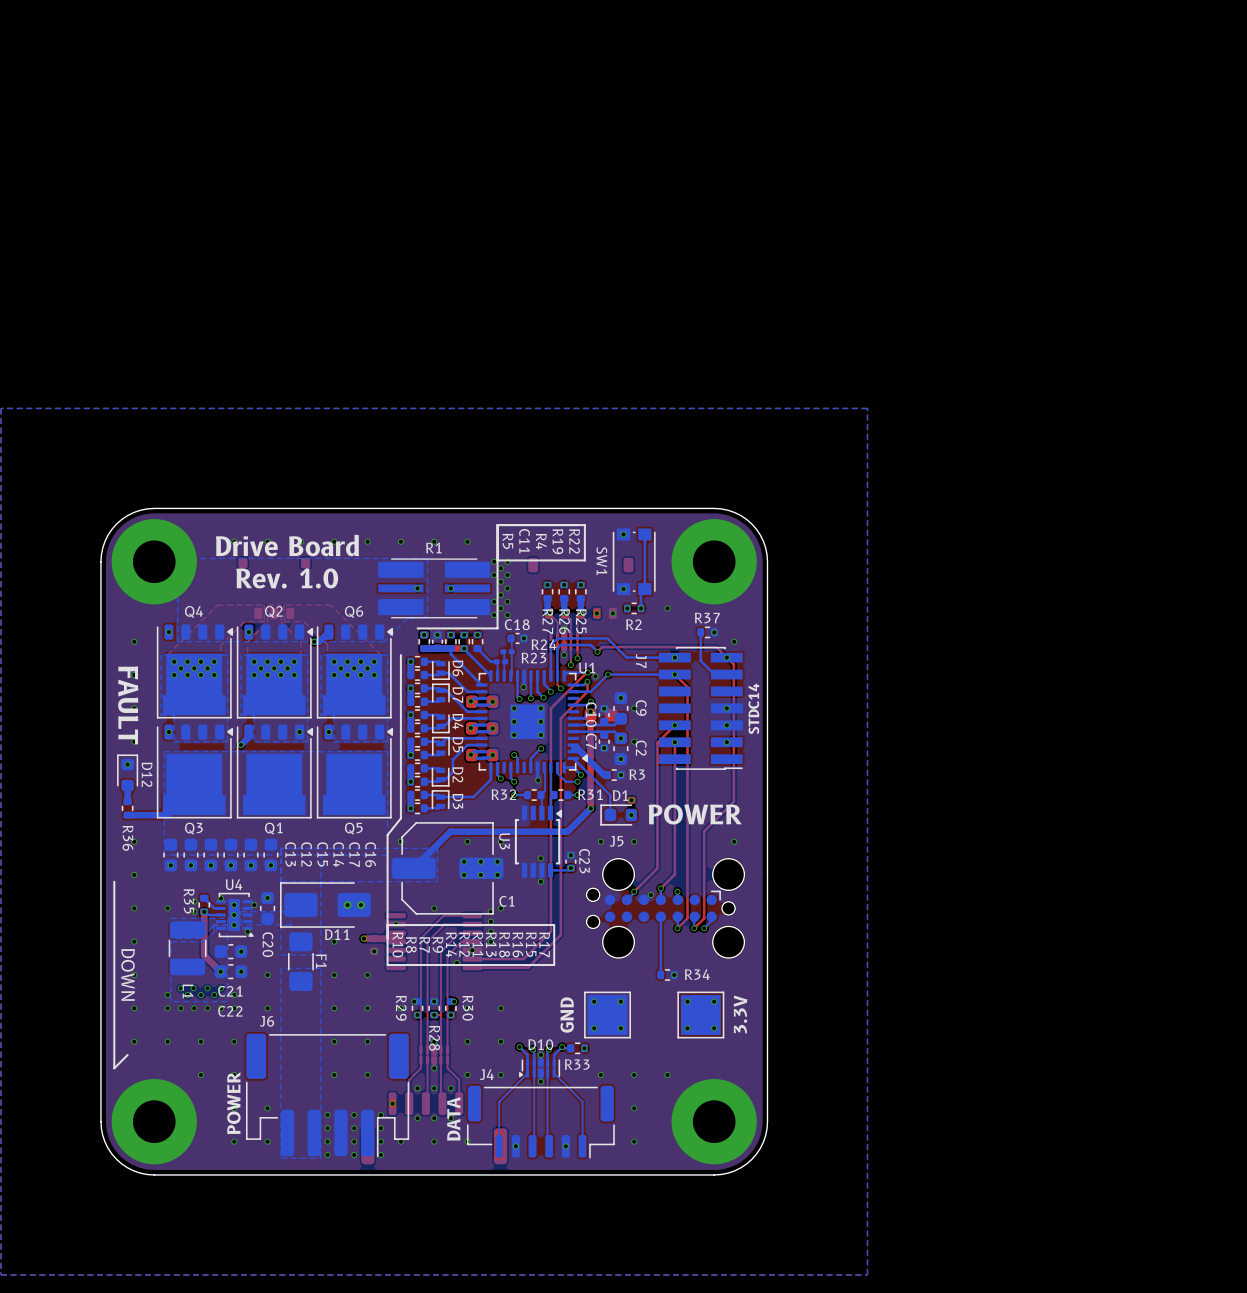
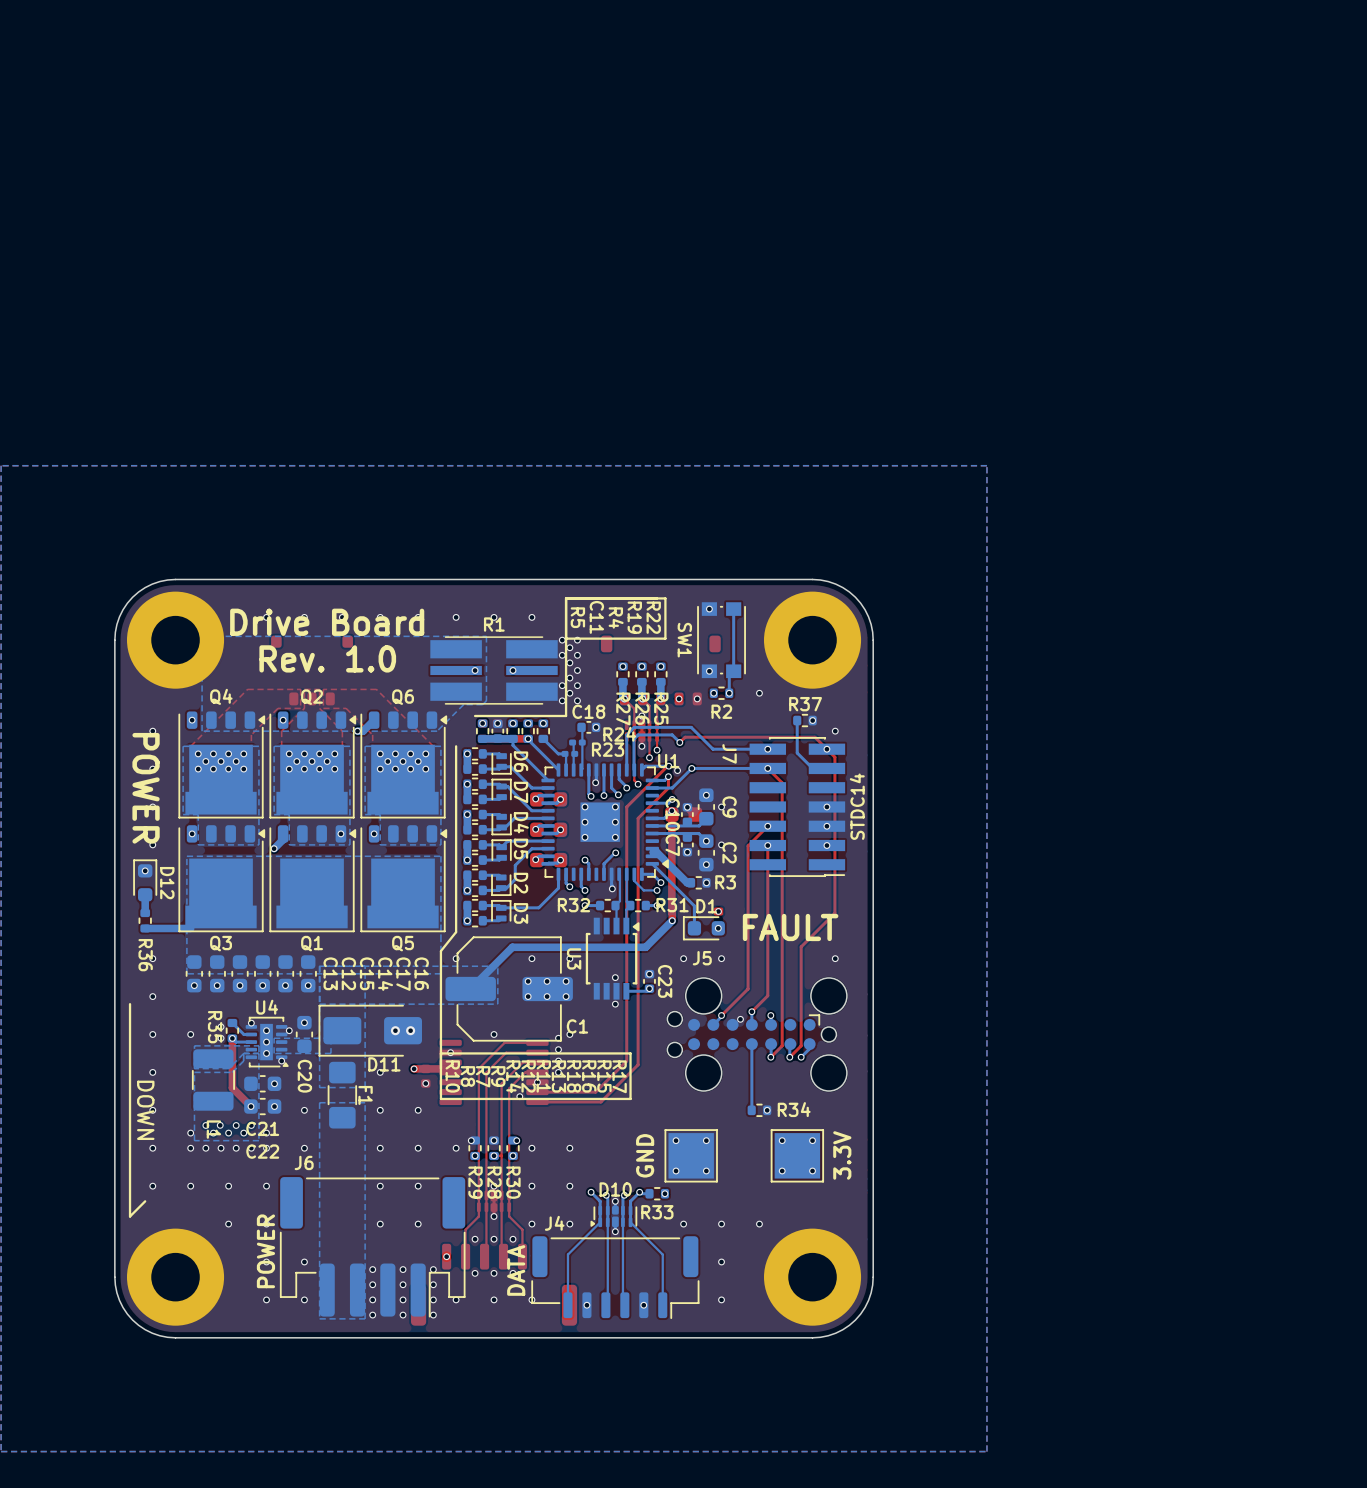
text: FAULT (128, 705) -> POWER (146, 788)
text: POWER (695, 814) -> FAULT (790, 927)
R29 name position: R29 (401, 1008) -> R29 (475, 1182)
R30 name position: R30 (467, 1008) -> R30 (513, 1182)

